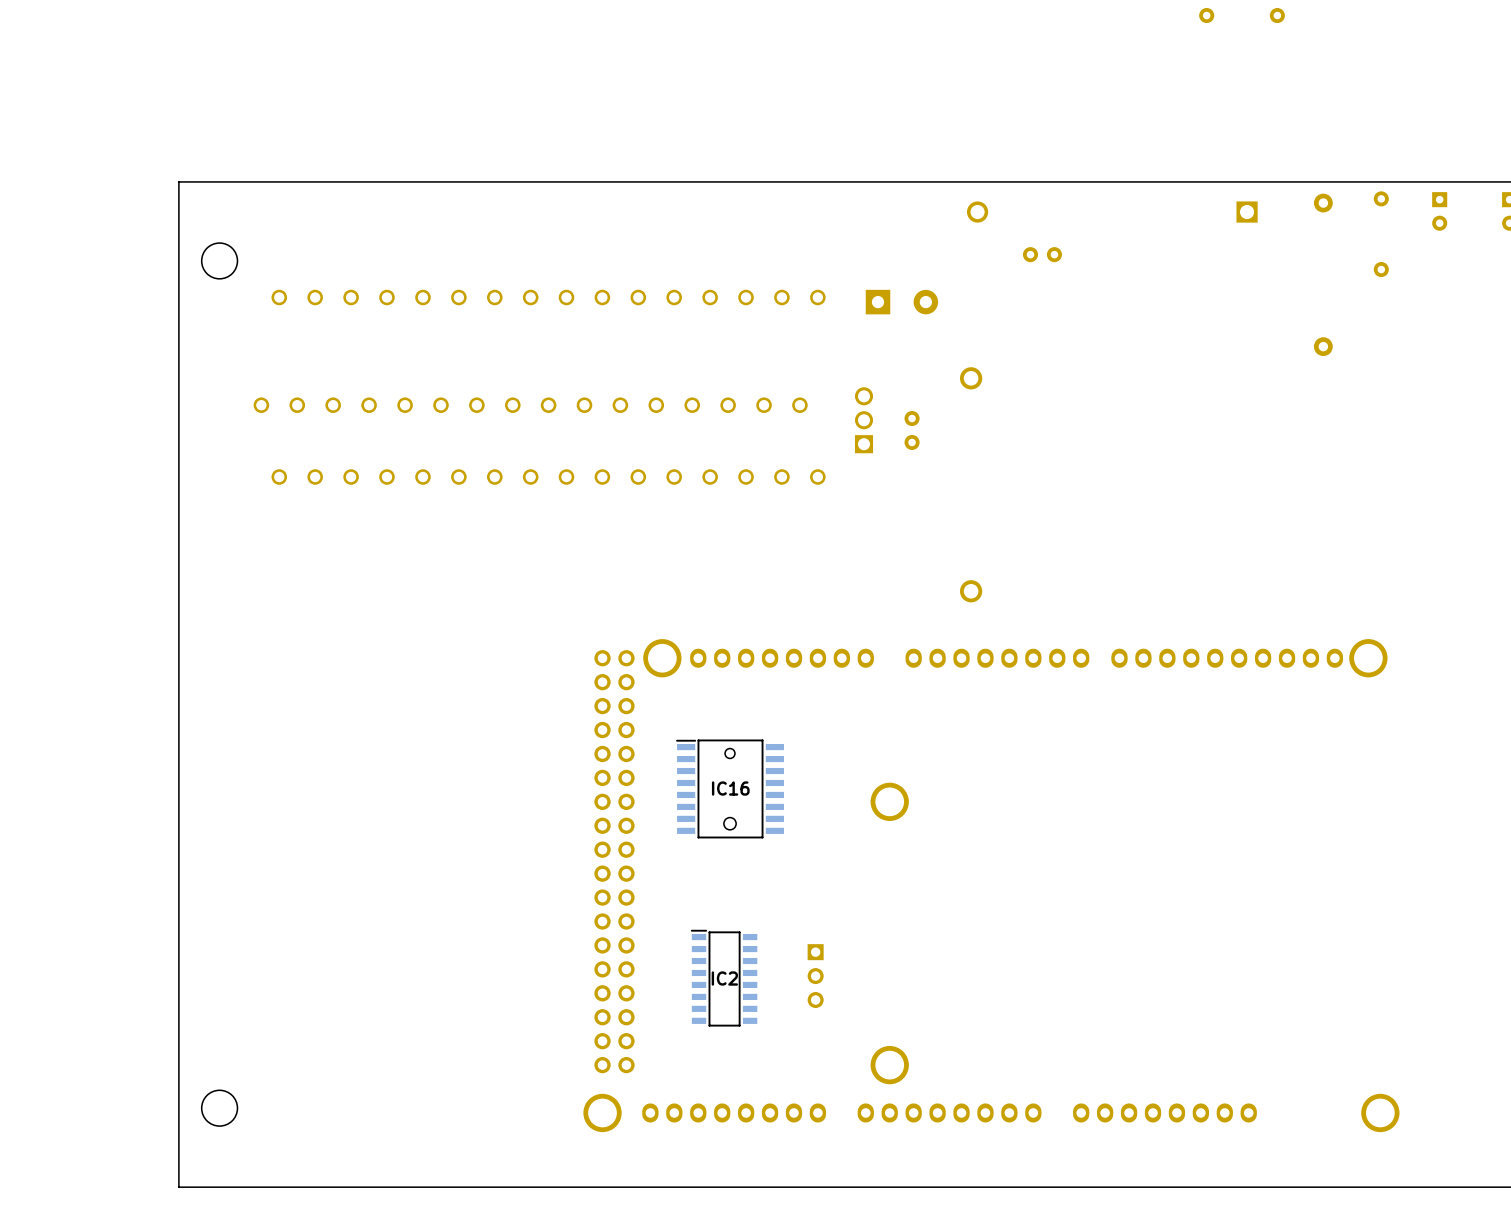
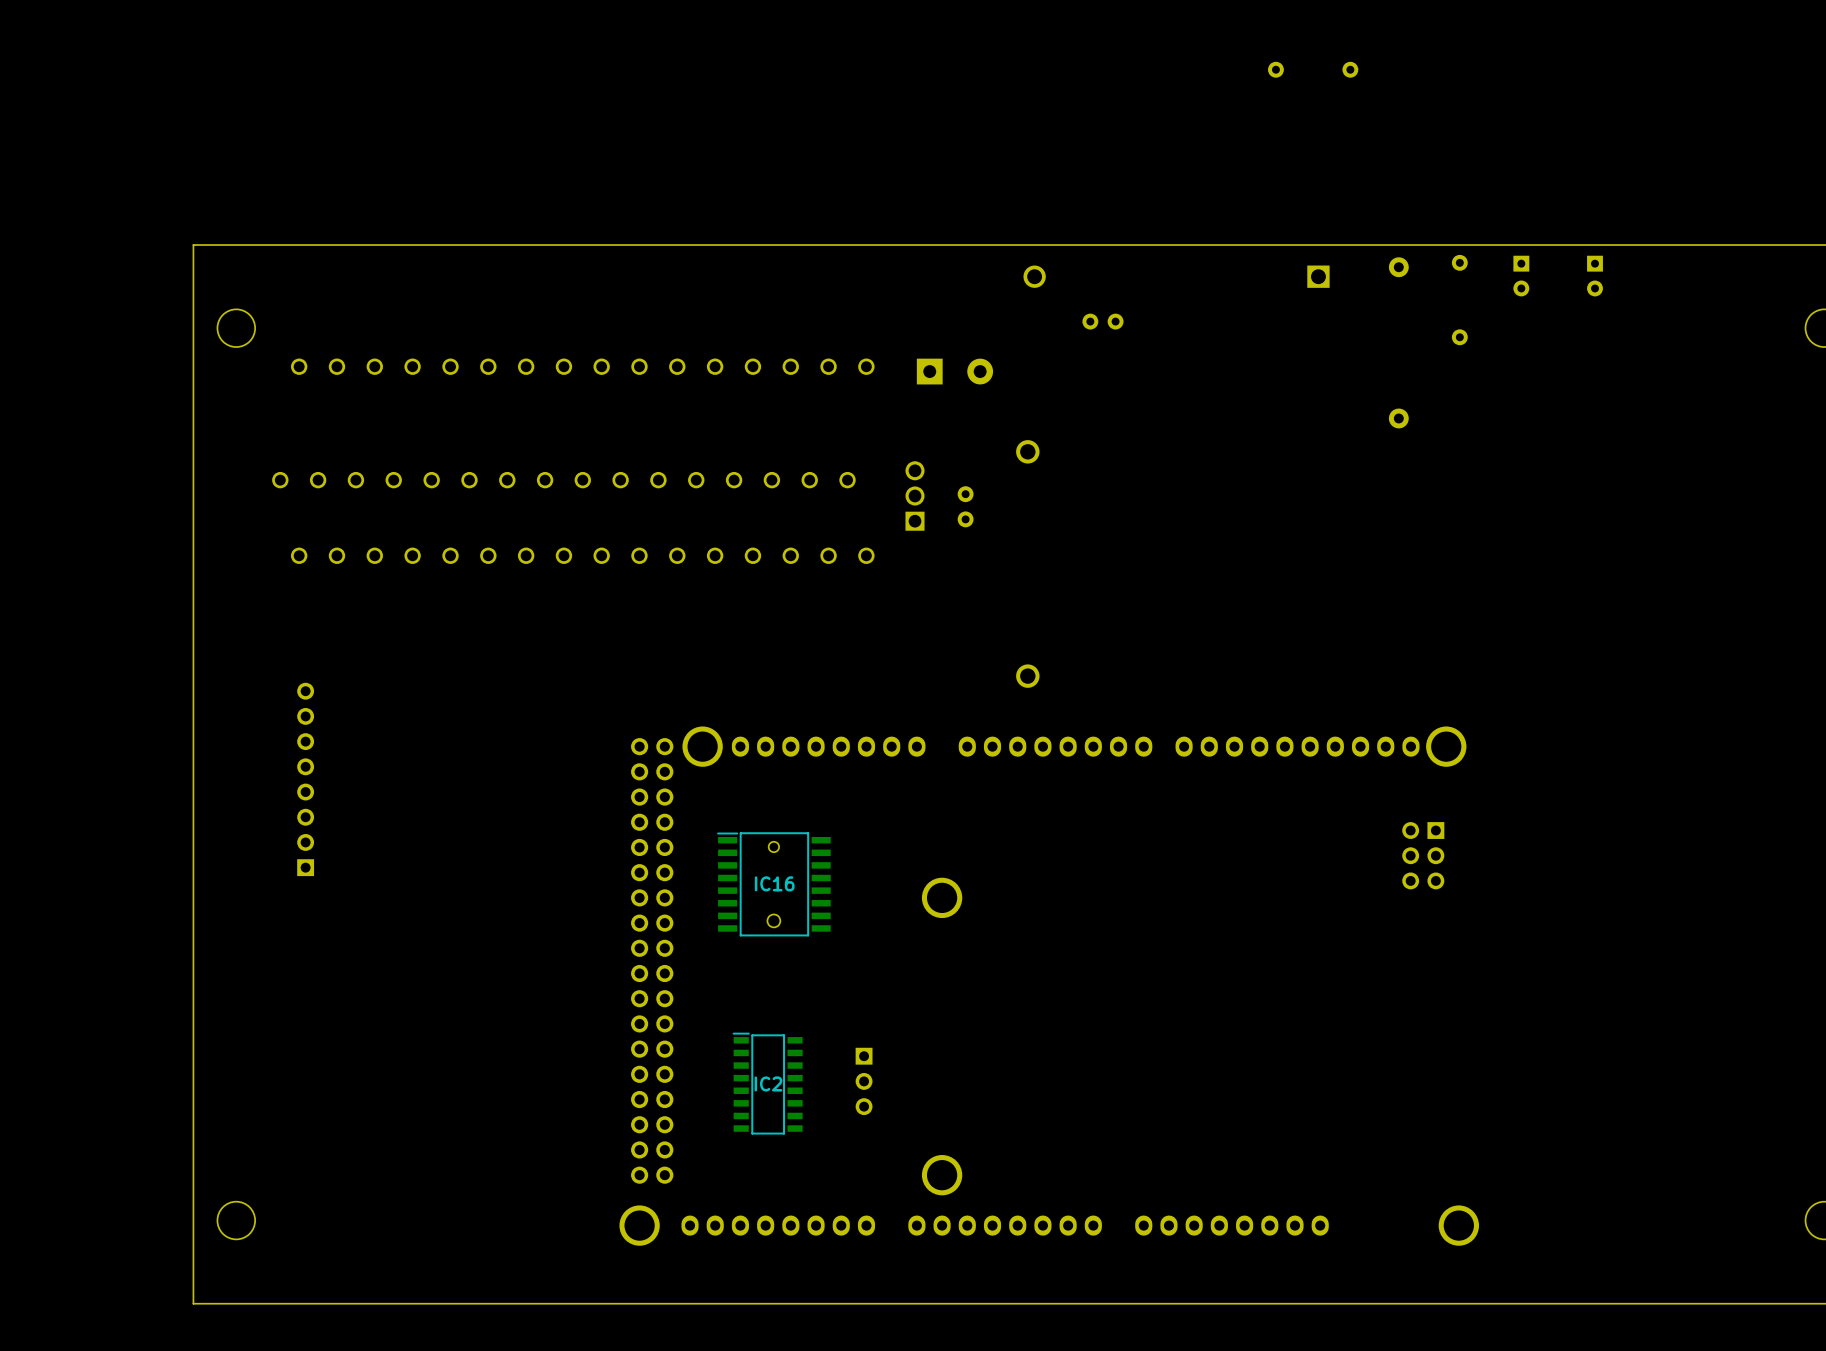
part: none -> (305, 779)
part: none -> (1423, 855)

